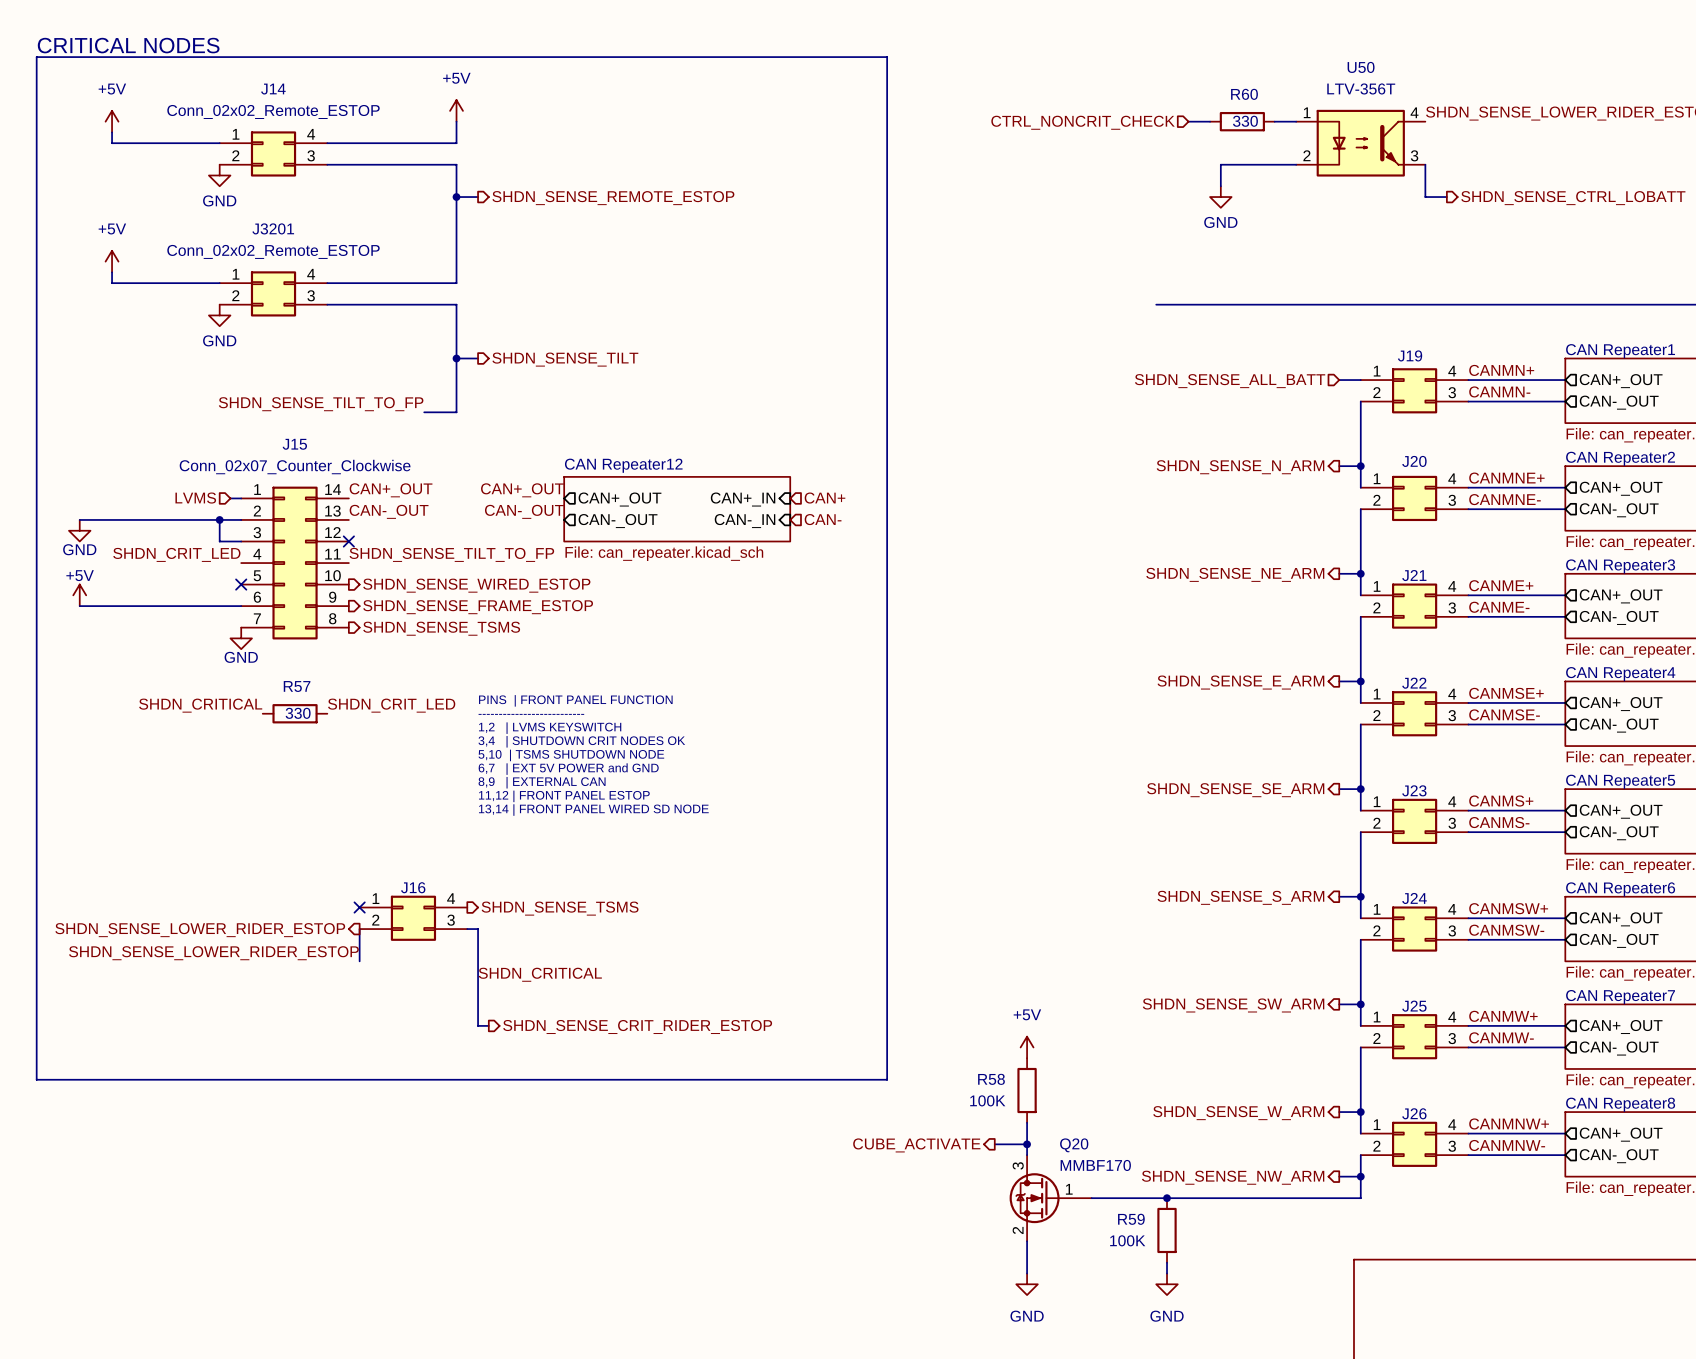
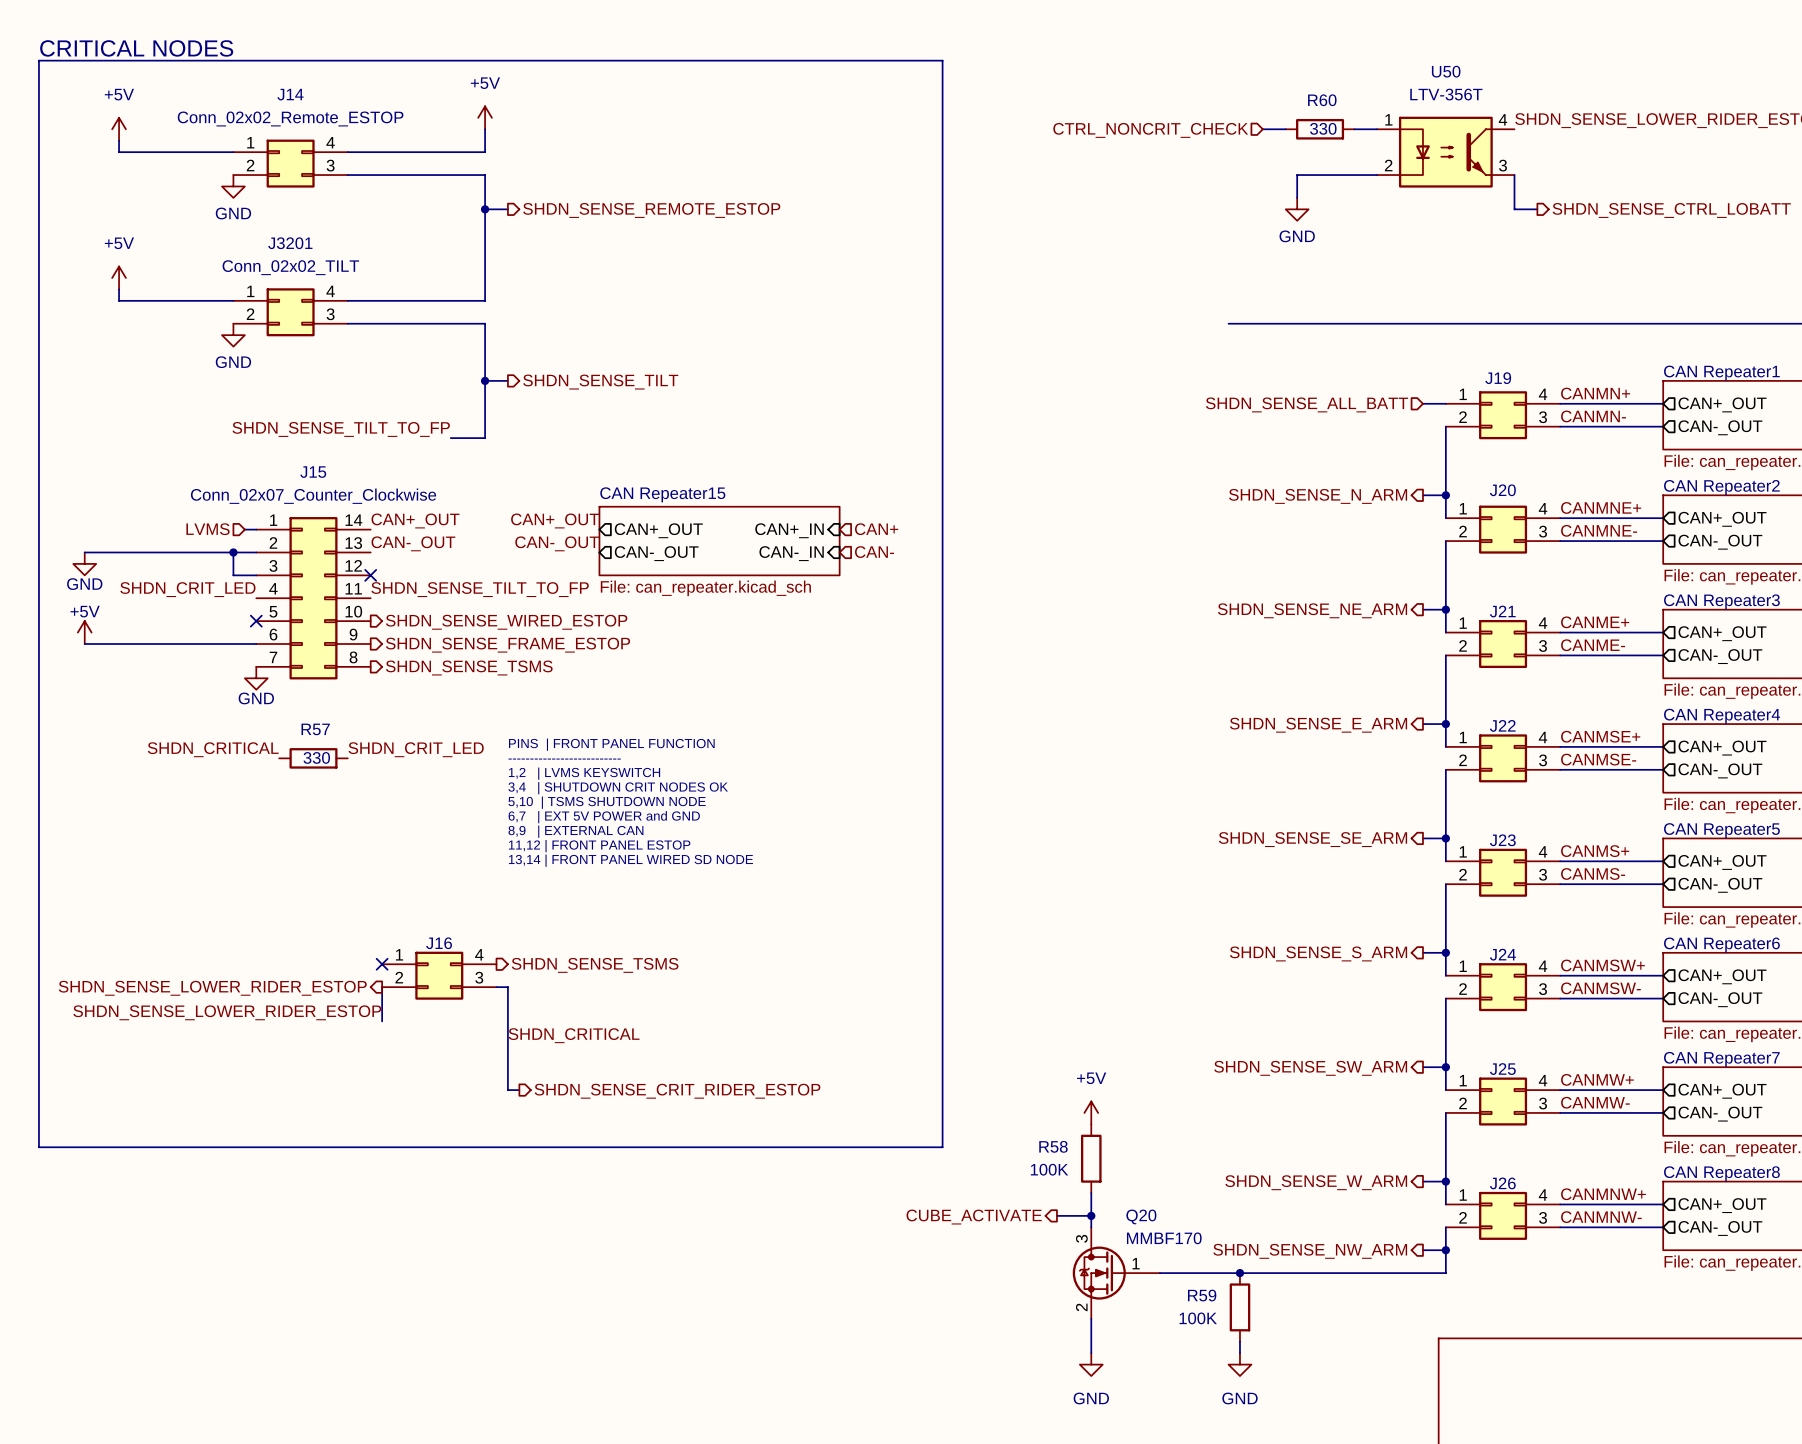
J3201 value: Conn_02x02_Remote_ESTOP (273, 251) -> Conn_02x02_TILT (290, 267)
sheet CAN Repeater12 name: CAN Repeater12 (623, 465) -> CAN Repeater15 (662, 494)

